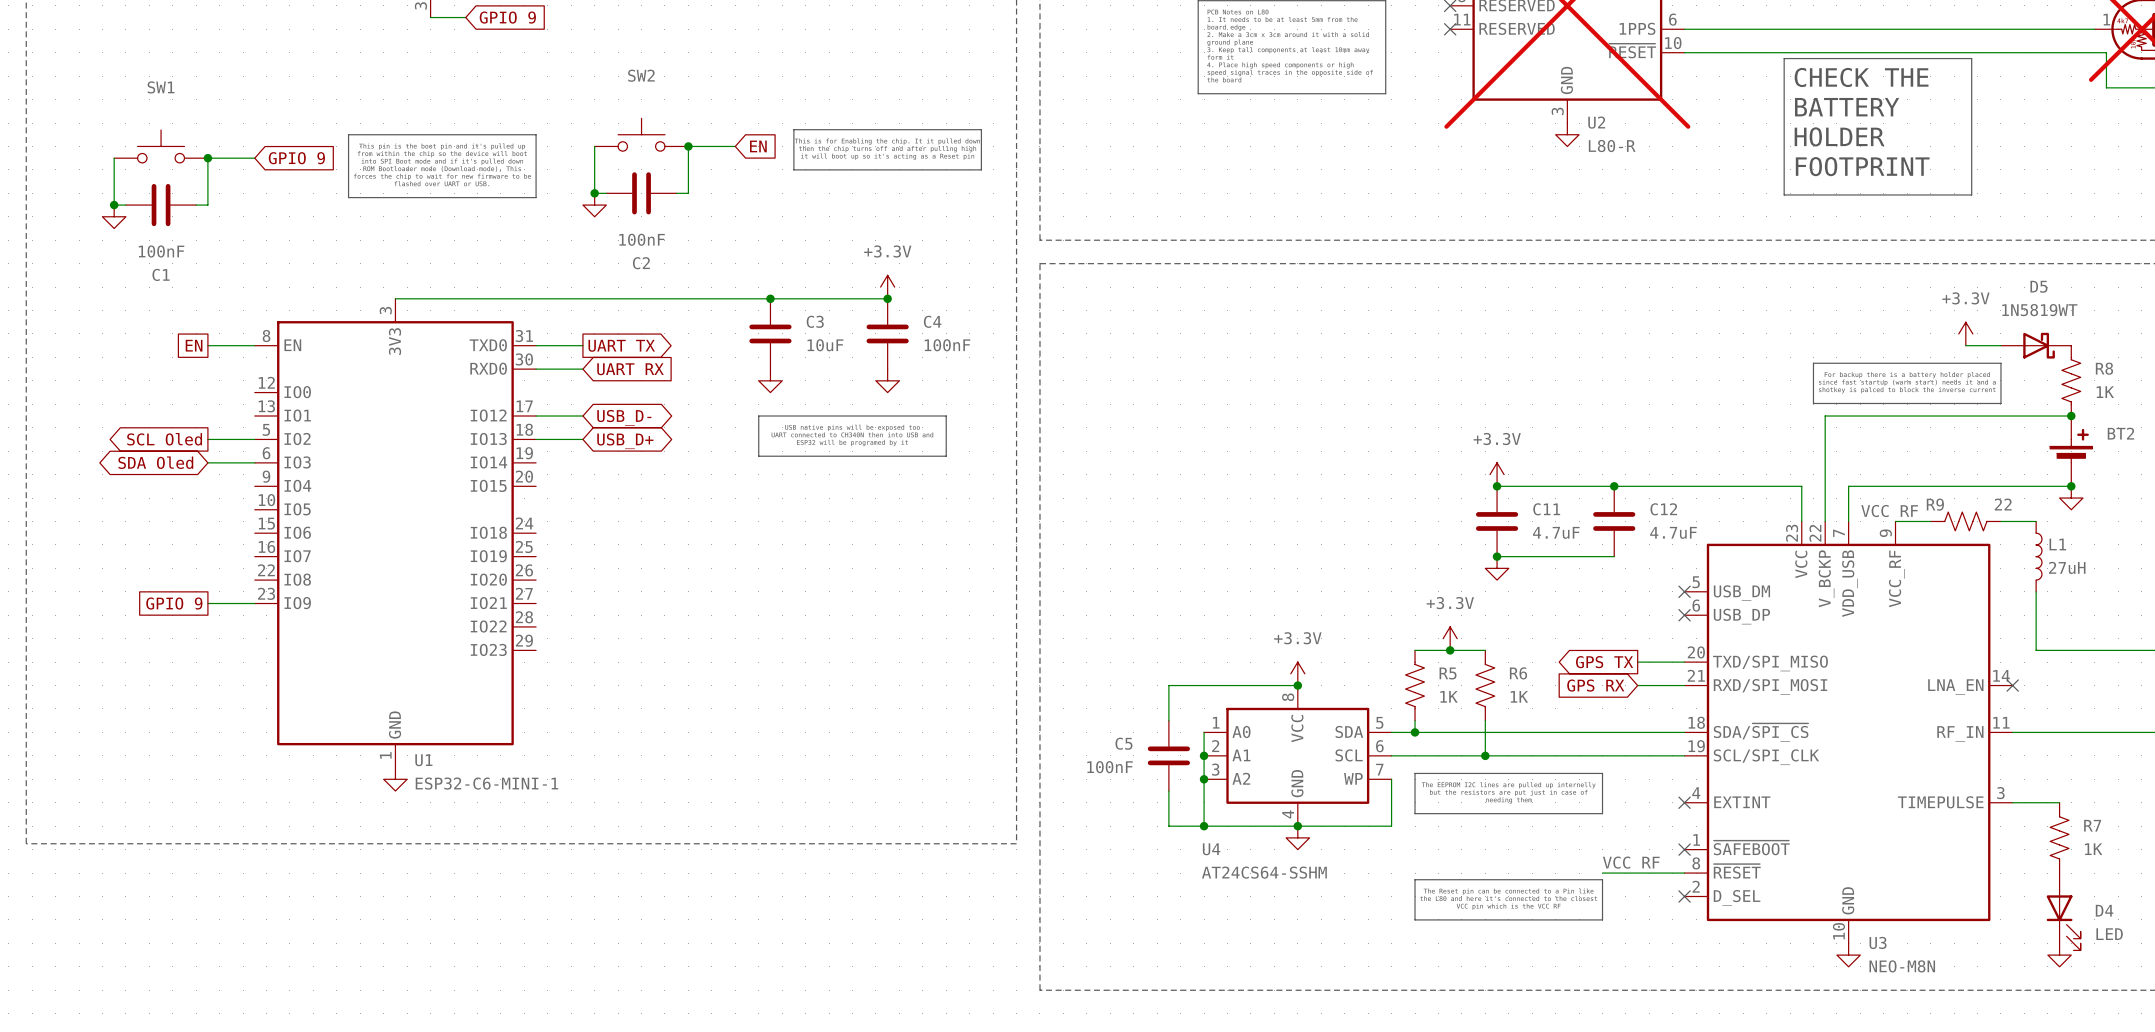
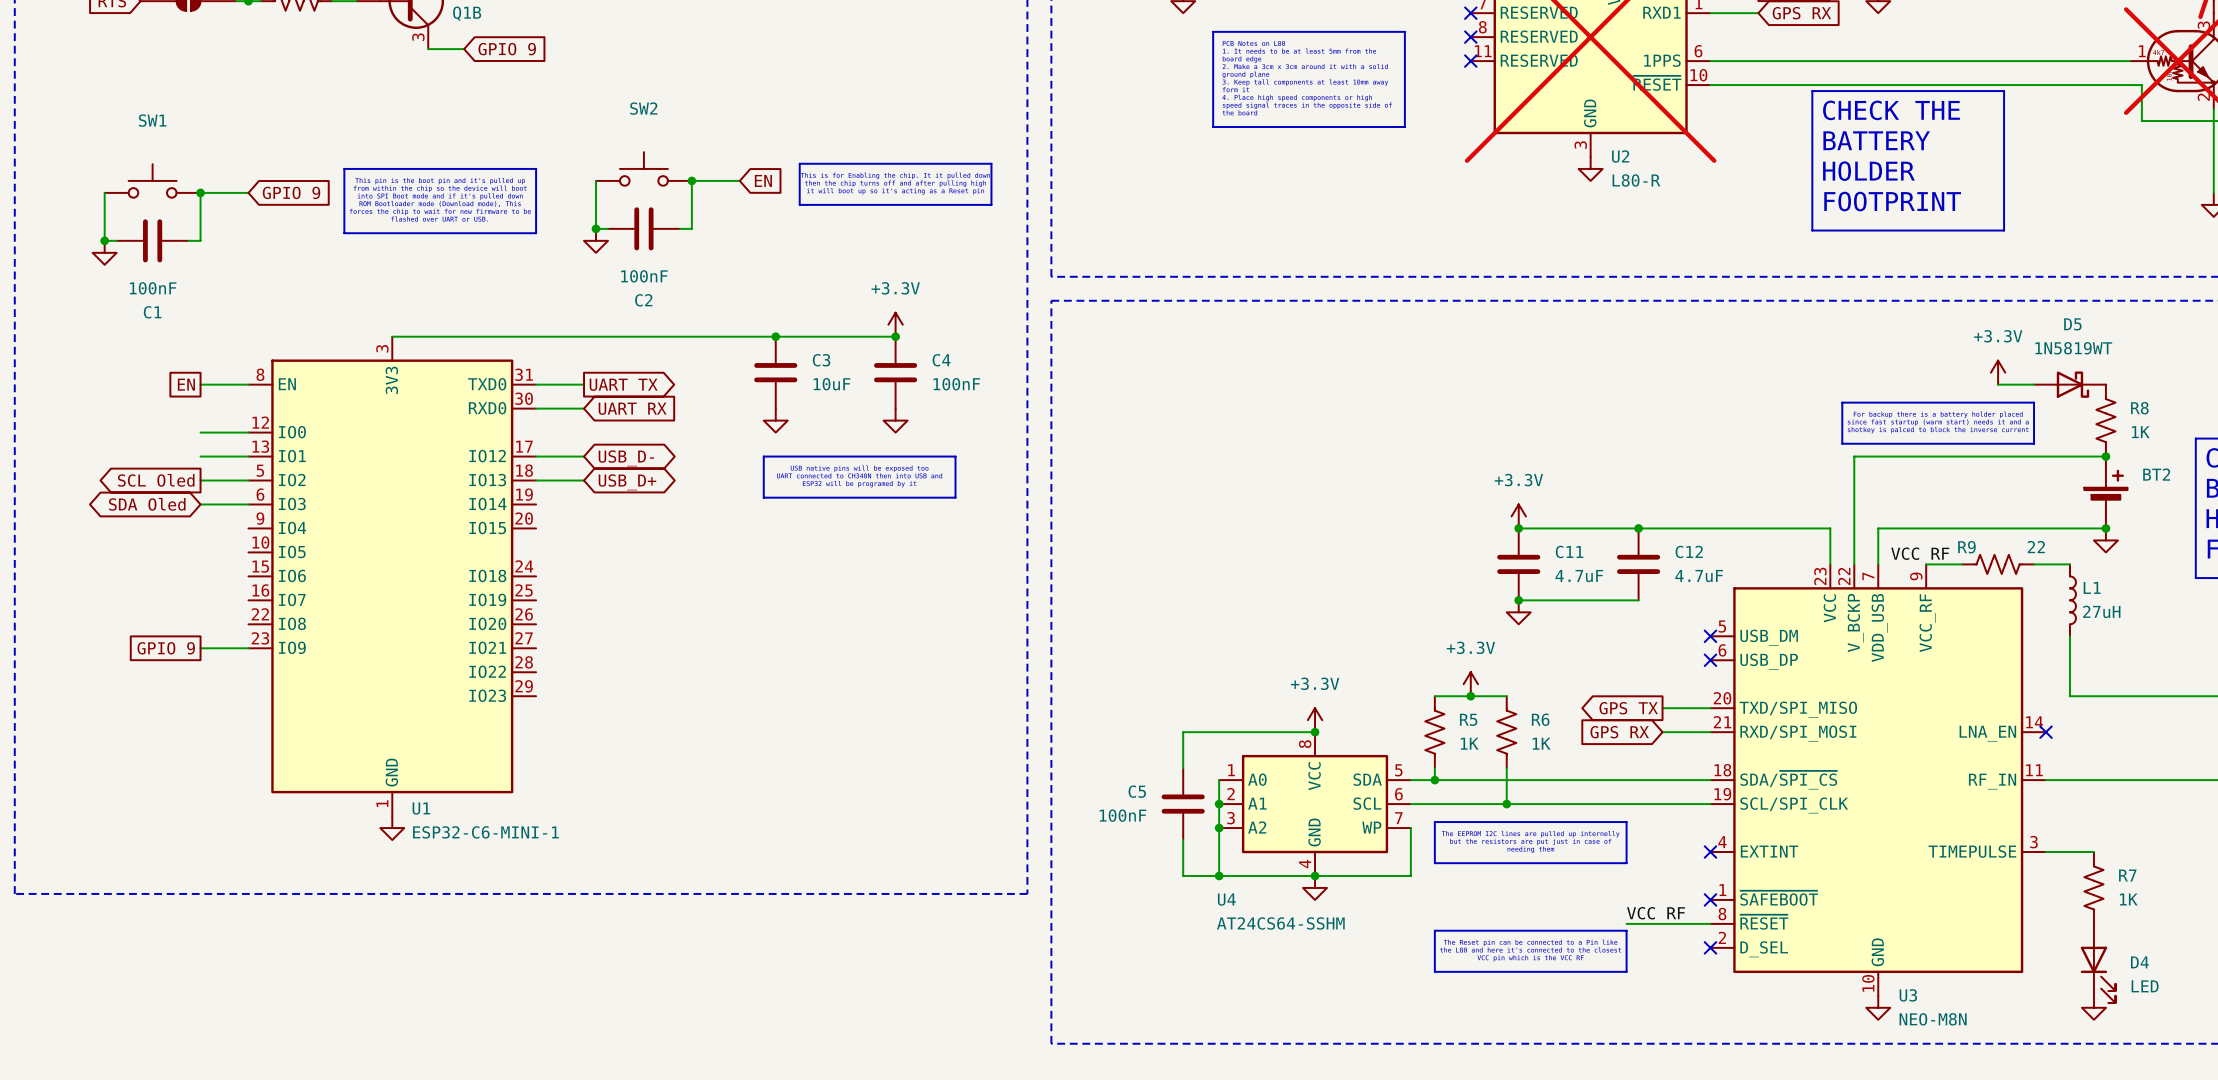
wire: none -> (200, 432) (248, 432)
wire: none -> (200, 456) (248, 456)

